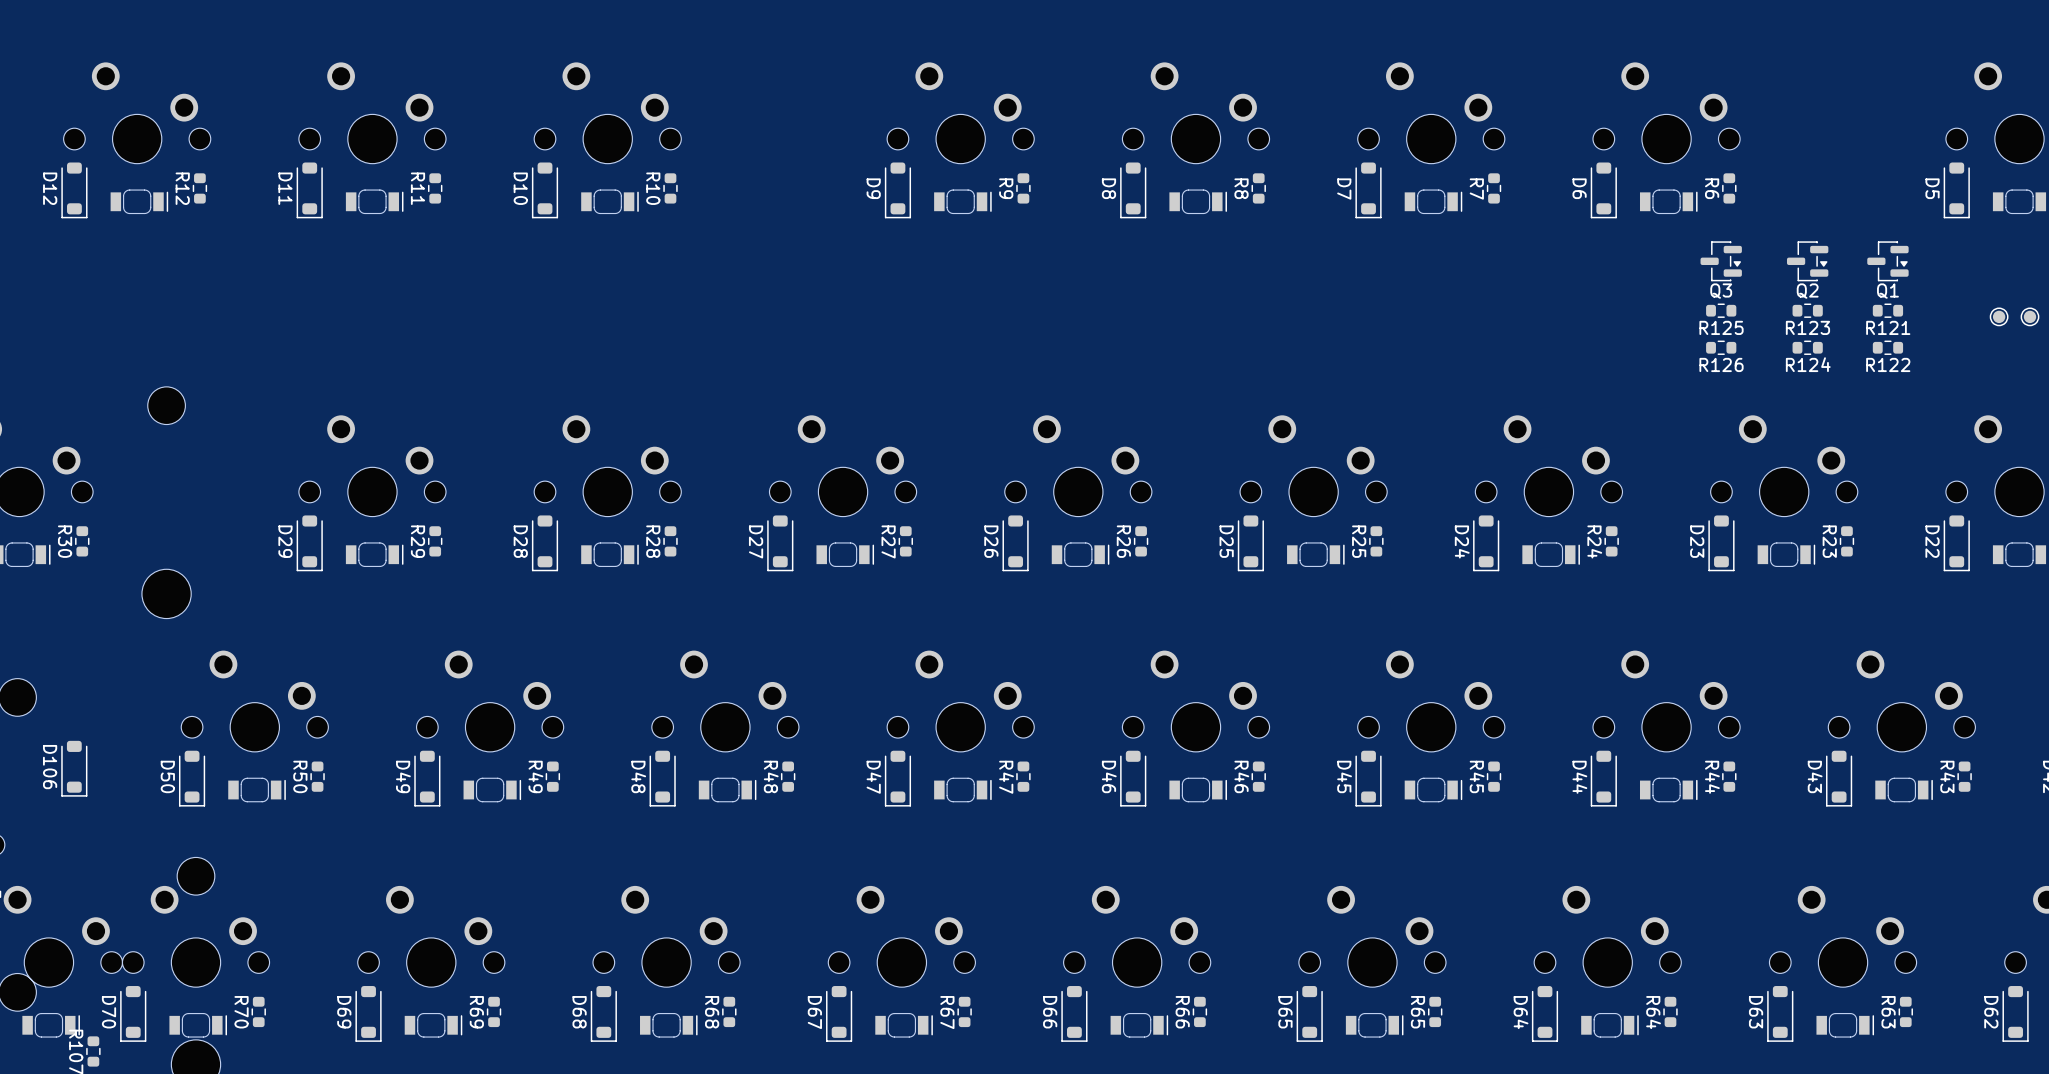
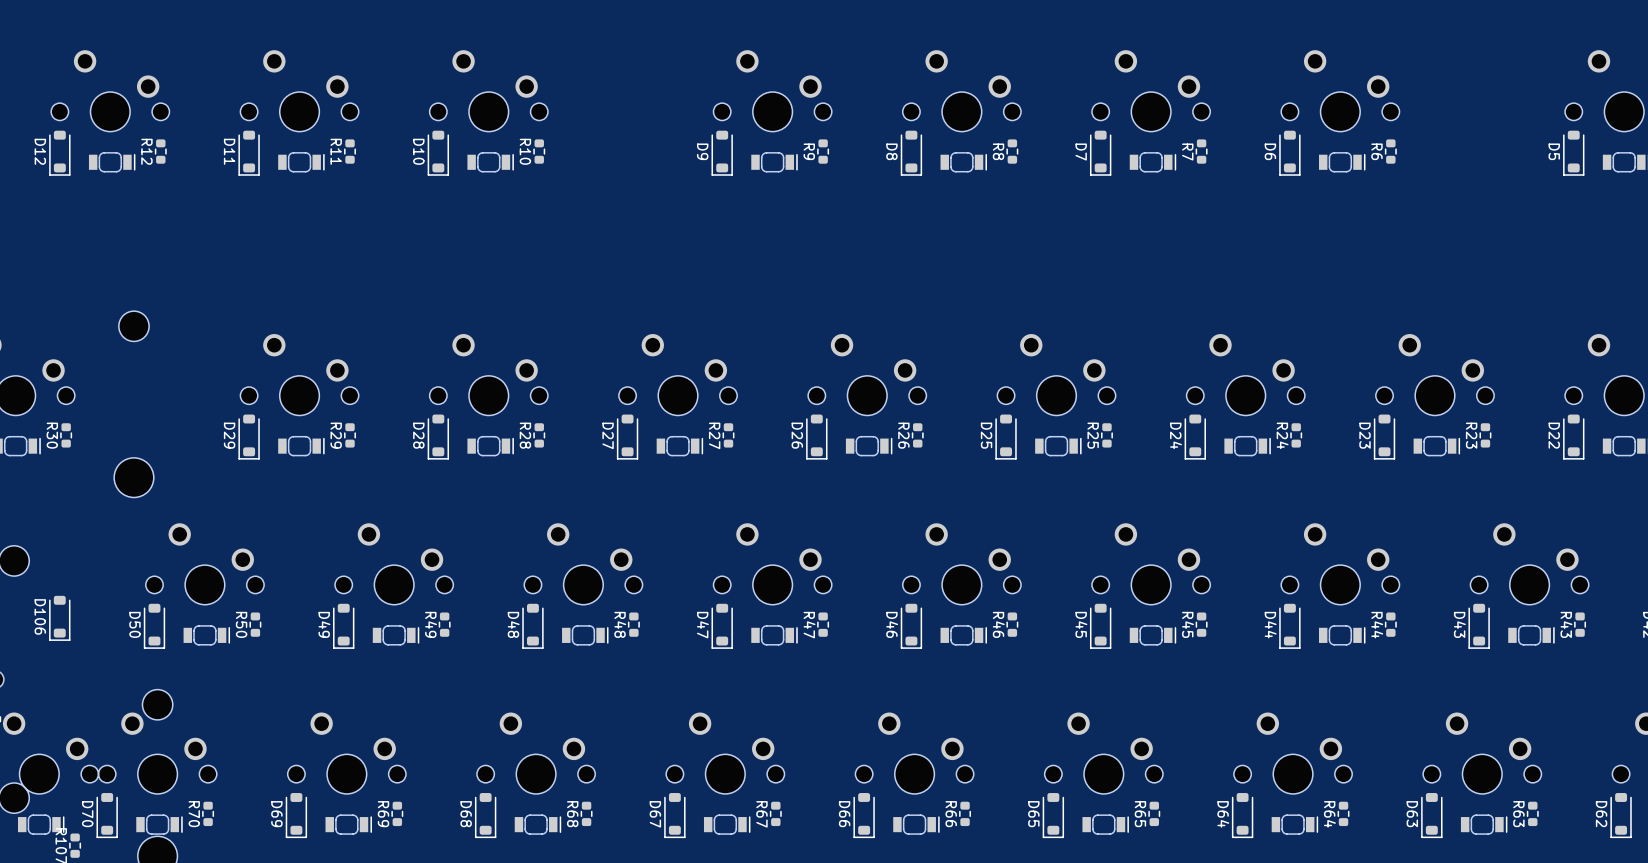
Q3: (1721, 261) -> none
Q2: (1807, 261) -> none
Q1: (1887, 261) -> none
R125: (1721, 310) -> none
R123: (1807, 310) -> none
R121: (1887, 310) -> none
part: (1999, 316) -> none
part: (2029, 316) -> none
R126: (1721, 347) -> none
R124: (1807, 347) -> none
R122: (1887, 347) -> none

